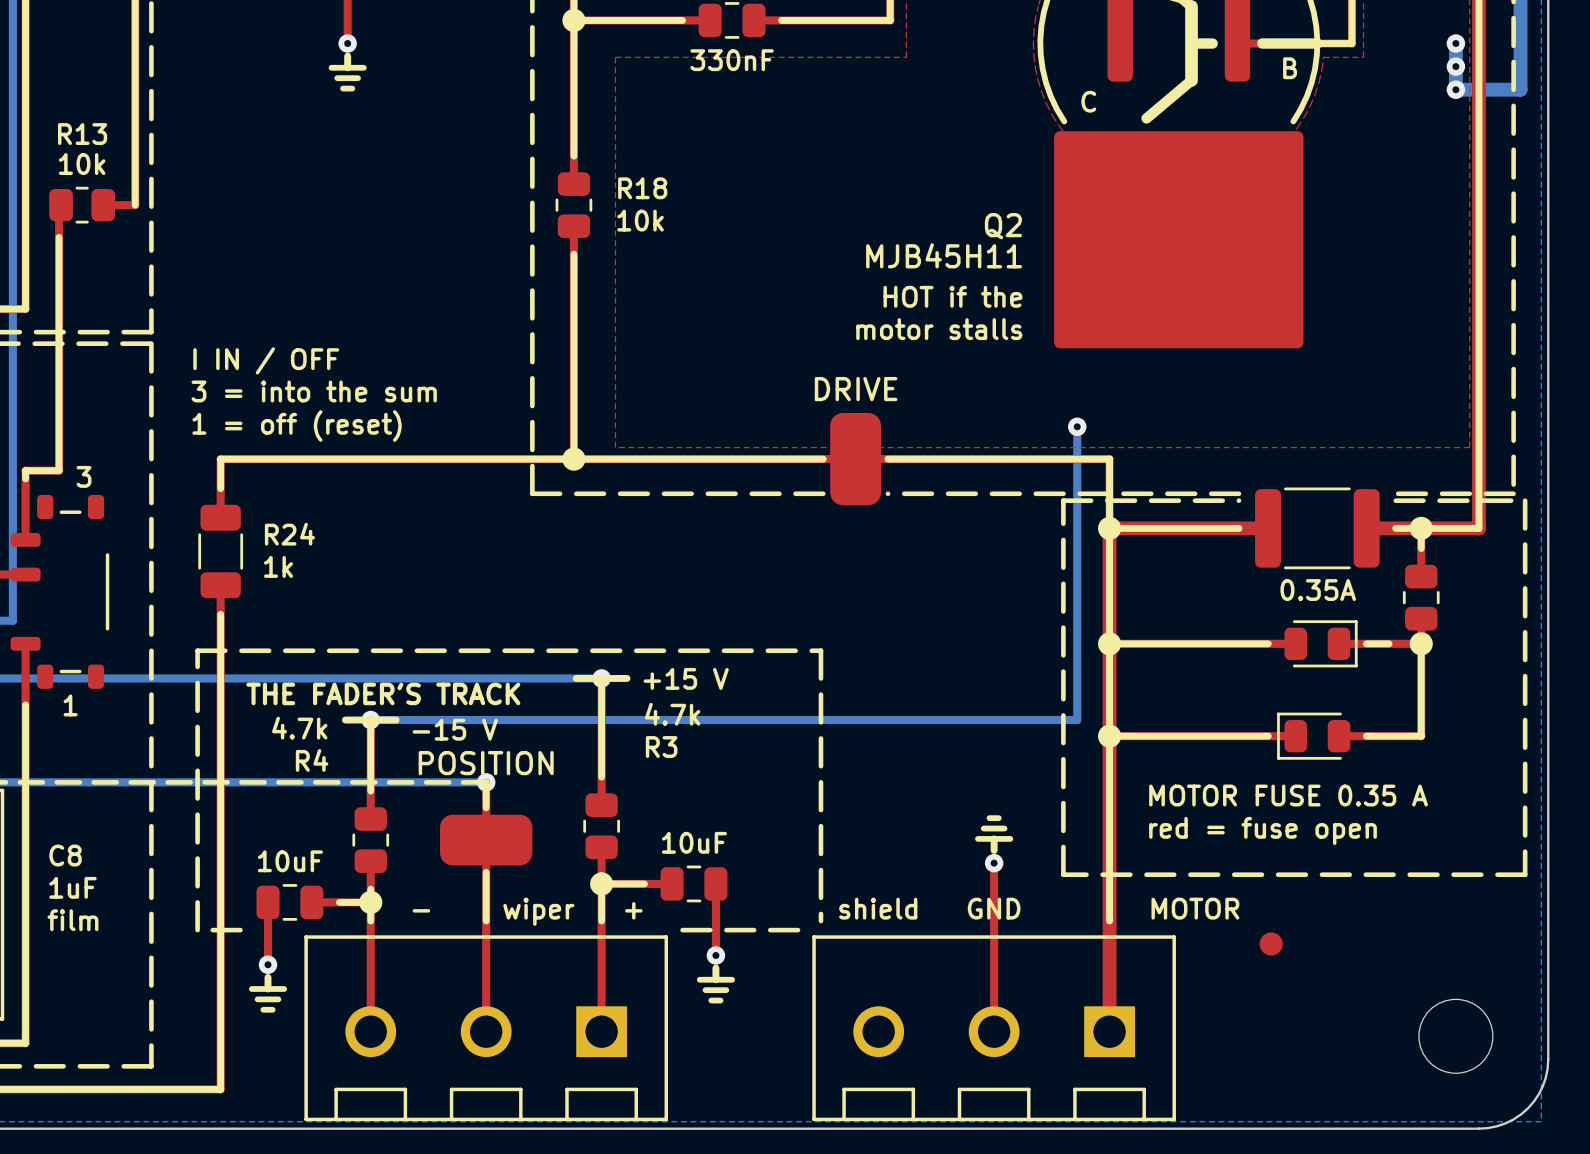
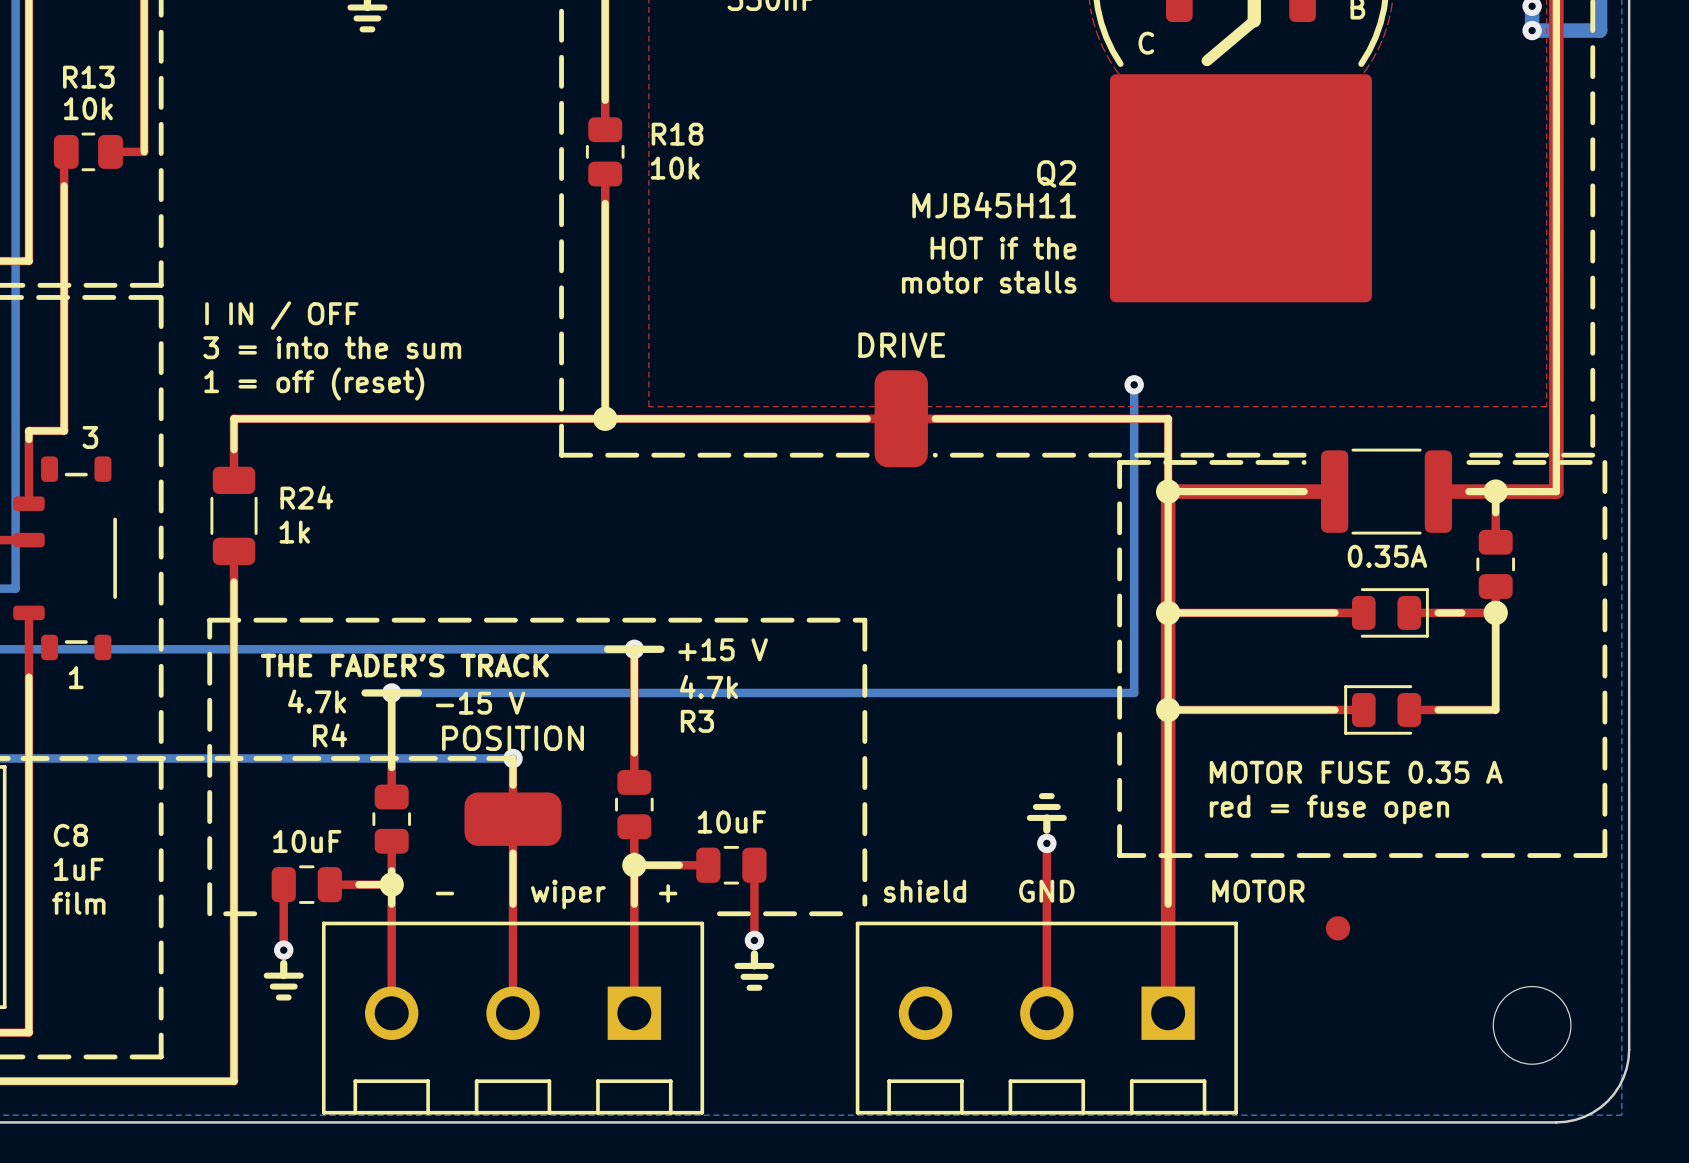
part footprint: [304, 935, 669, 1122] -> [321, 921, 705, 1115]
part footprint: [812, 935, 1176, 1122] -> [855, 921, 1238, 1115]

